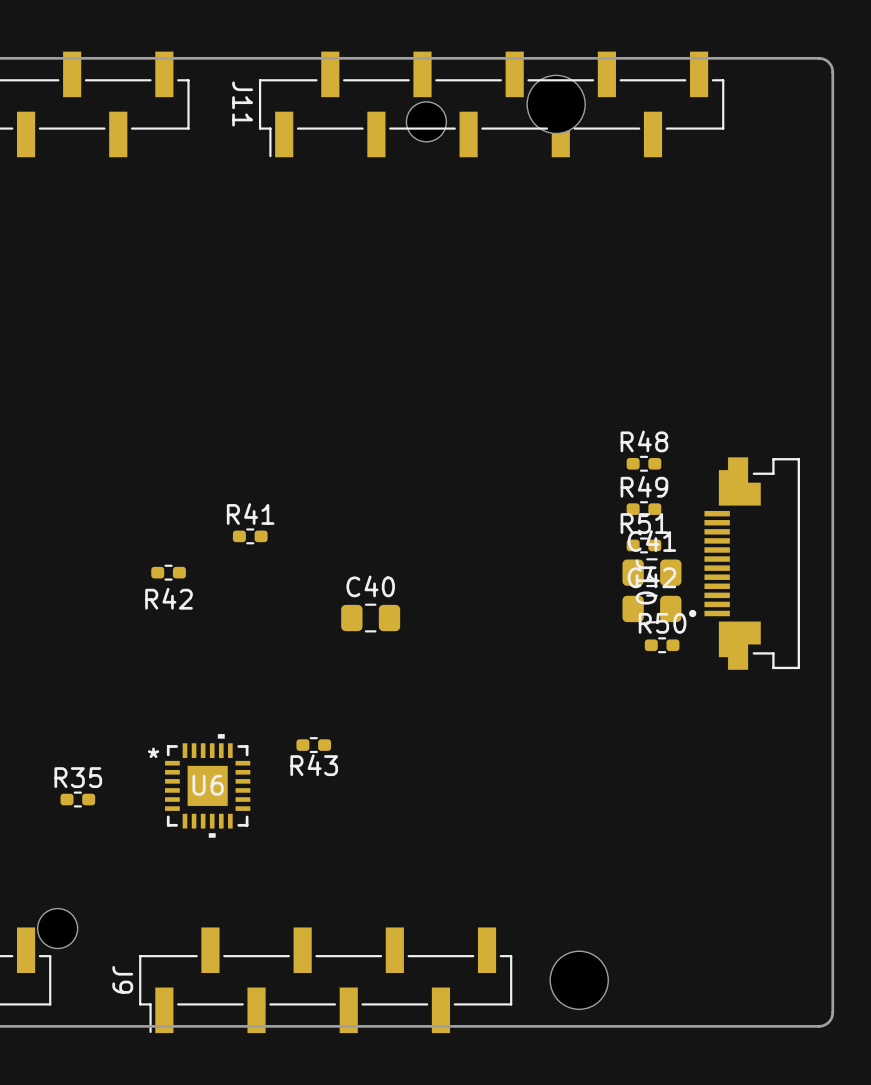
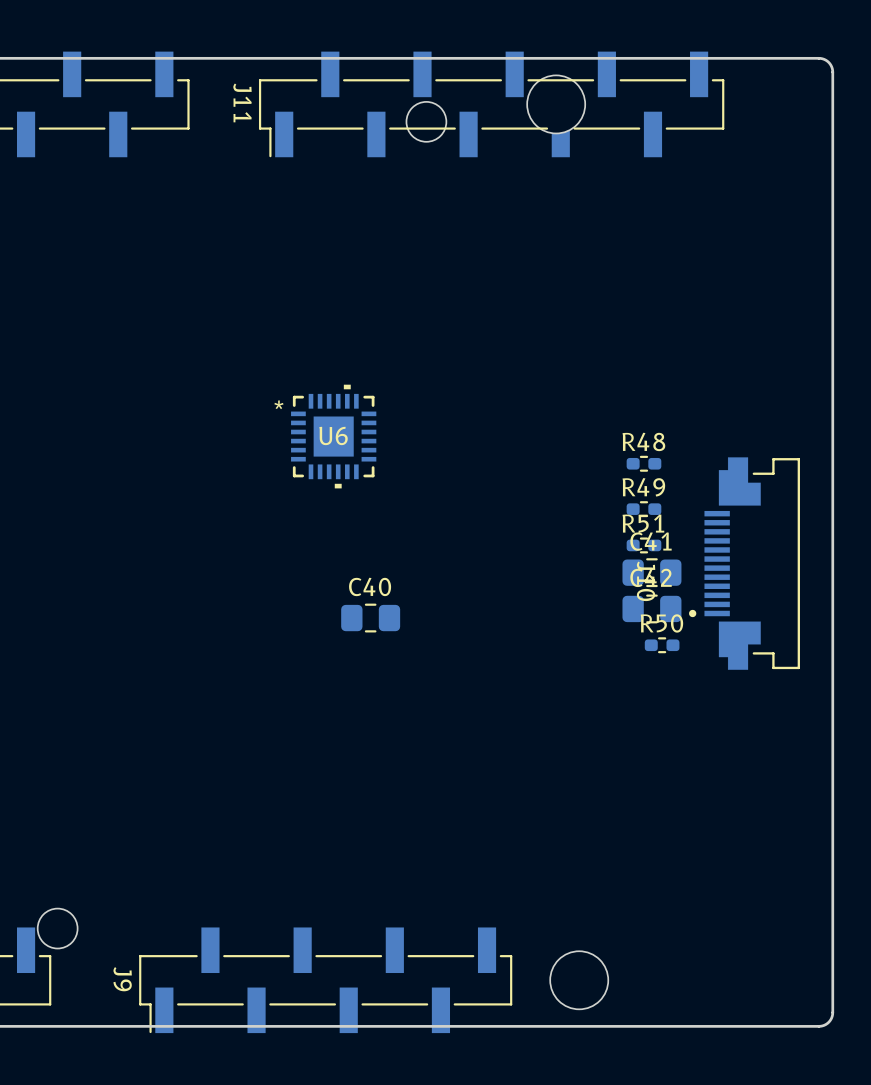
R41: (250, 536) -> none
R42: (168, 572) -> none
R43: (313, 745) -> none
U6 position: (207, 785) -> (333, 436)
R35: (77, 799) -> none

